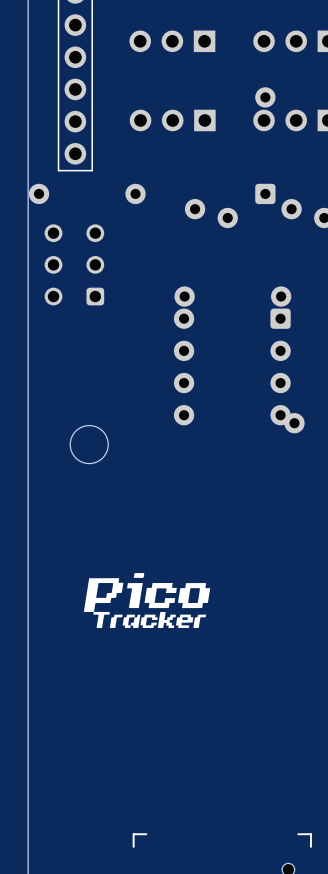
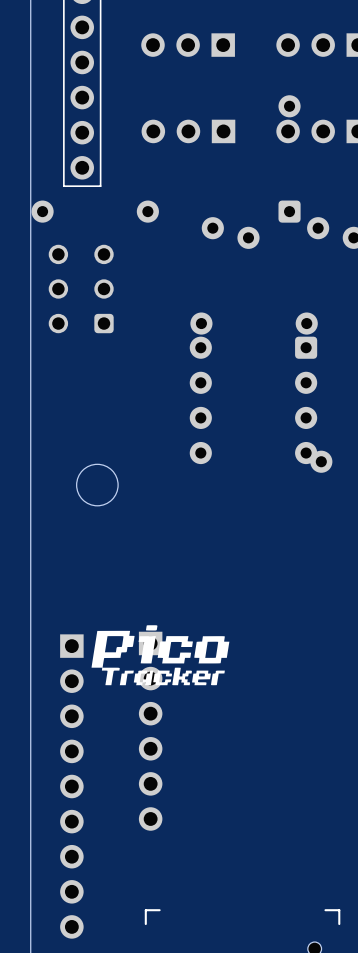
part: none -> (150, 731)
part: none -> (71, 786)

